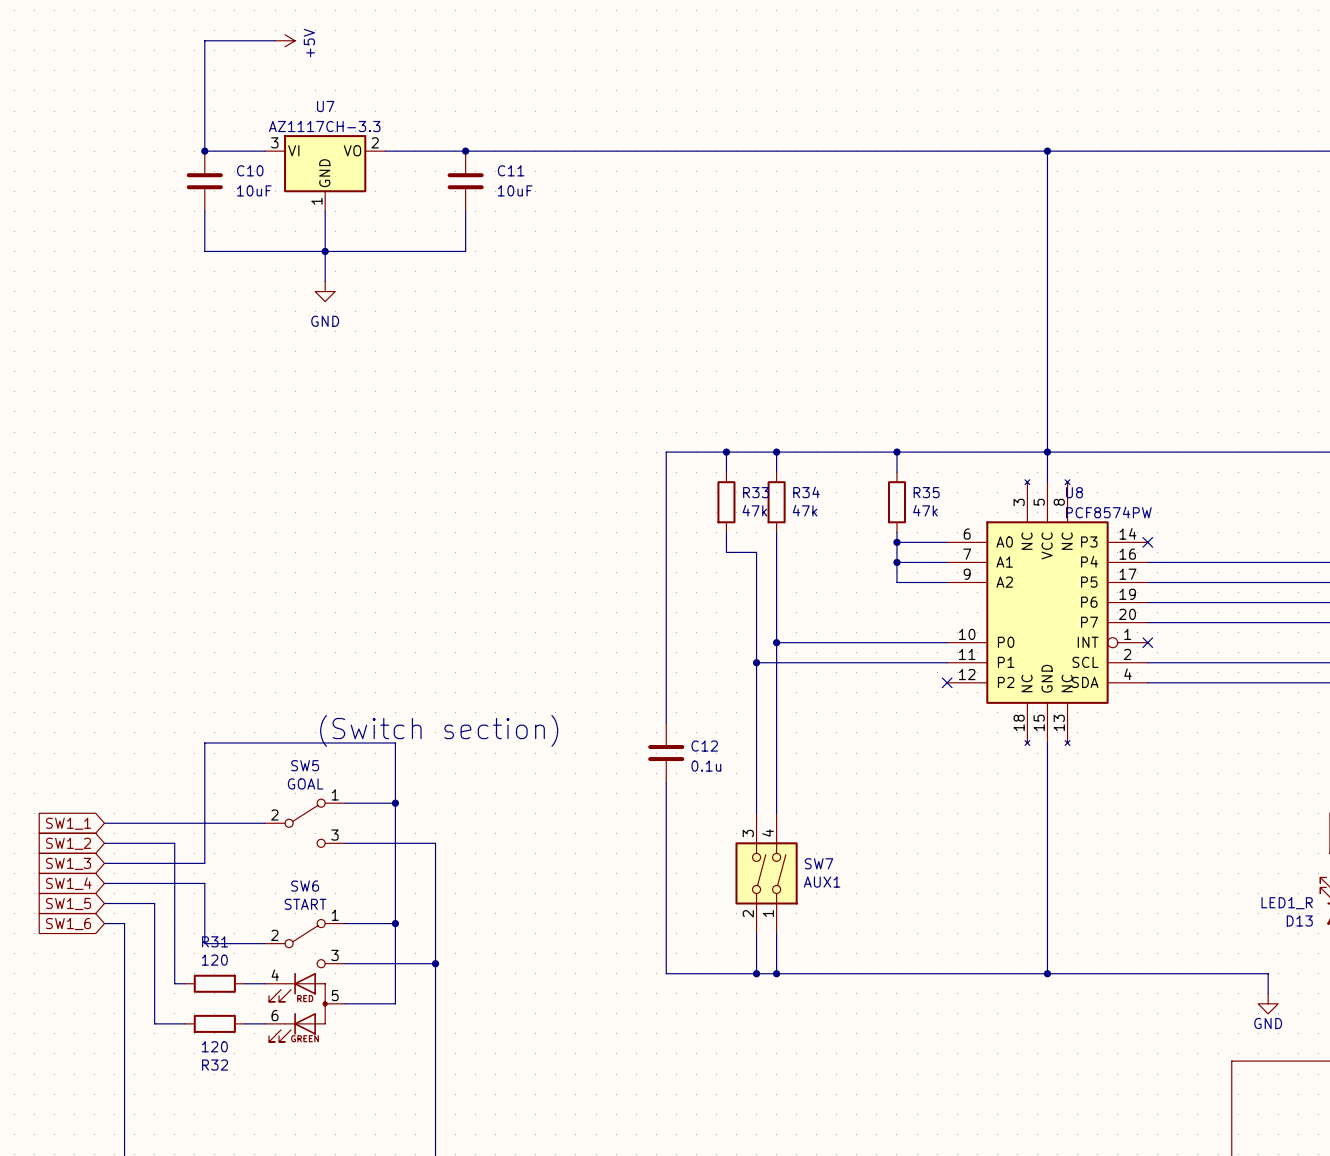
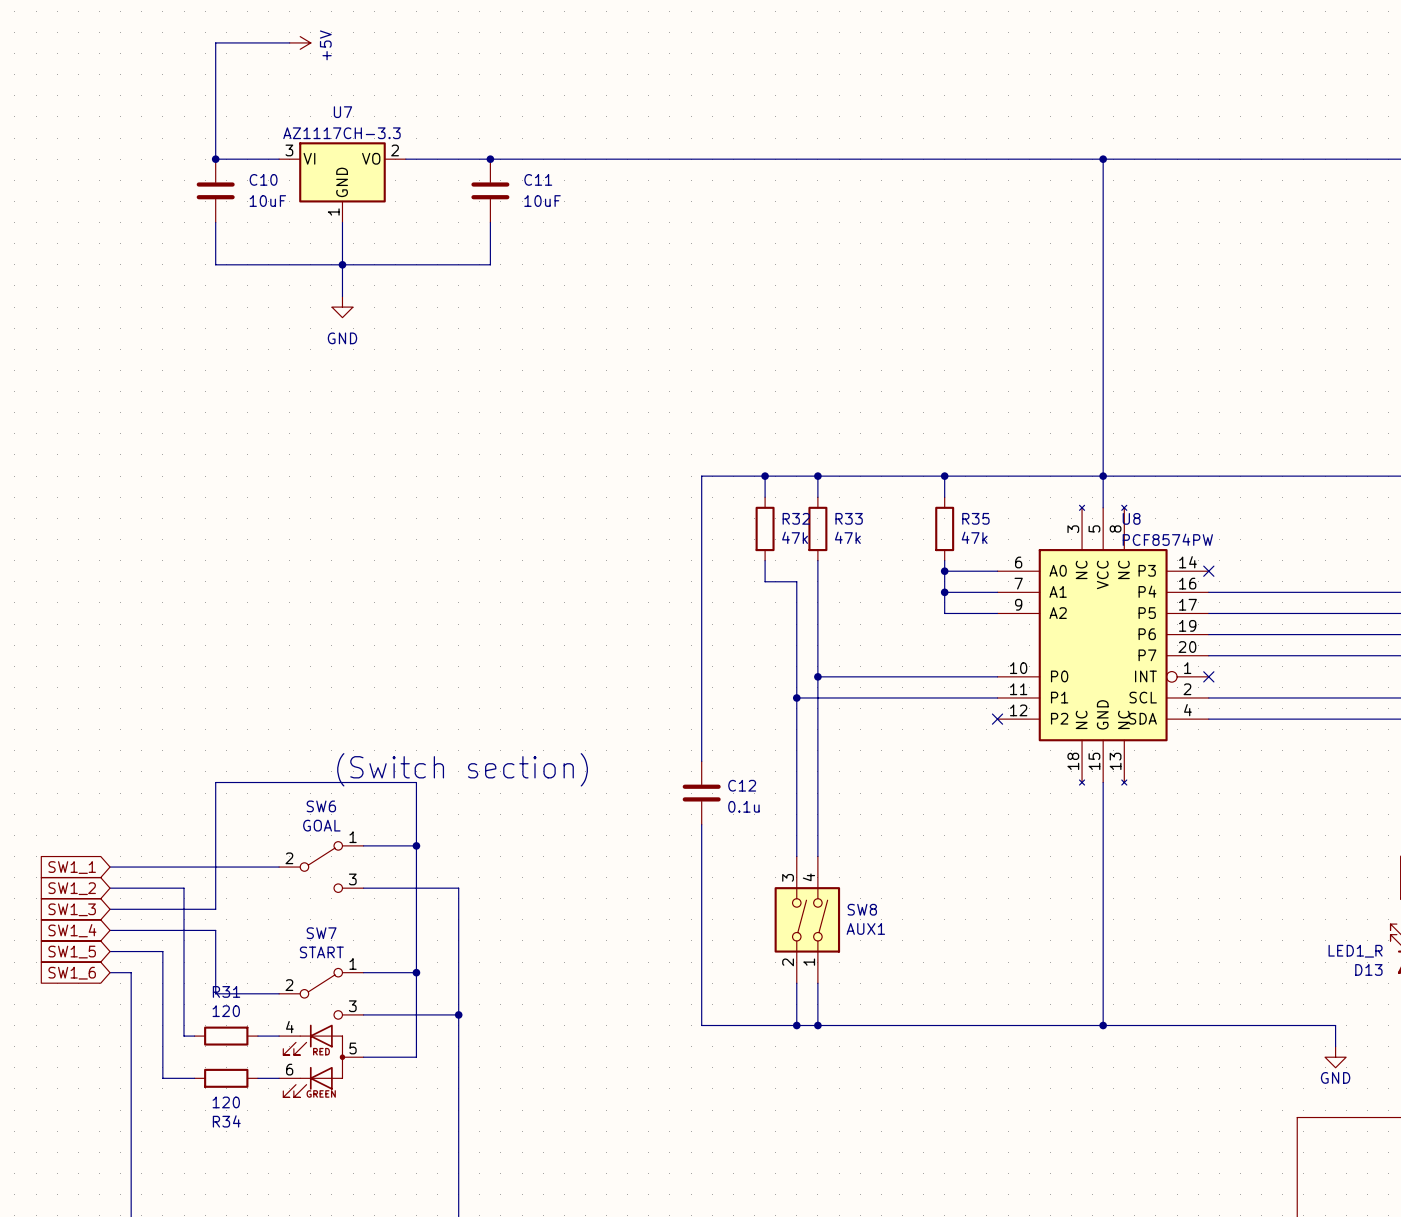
R33 name: R33 (756, 492) -> R32 (796, 518)
R34 name: R34 (806, 492) -> R33 (849, 518)
SW5 name: SW5 (305, 765) -> SW6 (321, 806)
SW7 name: SW7 (819, 863) -> SW8 (862, 909)
SW6 name: SW6 (305, 886) -> SW7 (321, 933)
R32 name: R32 (215, 1065) -> R34 (226, 1121)

